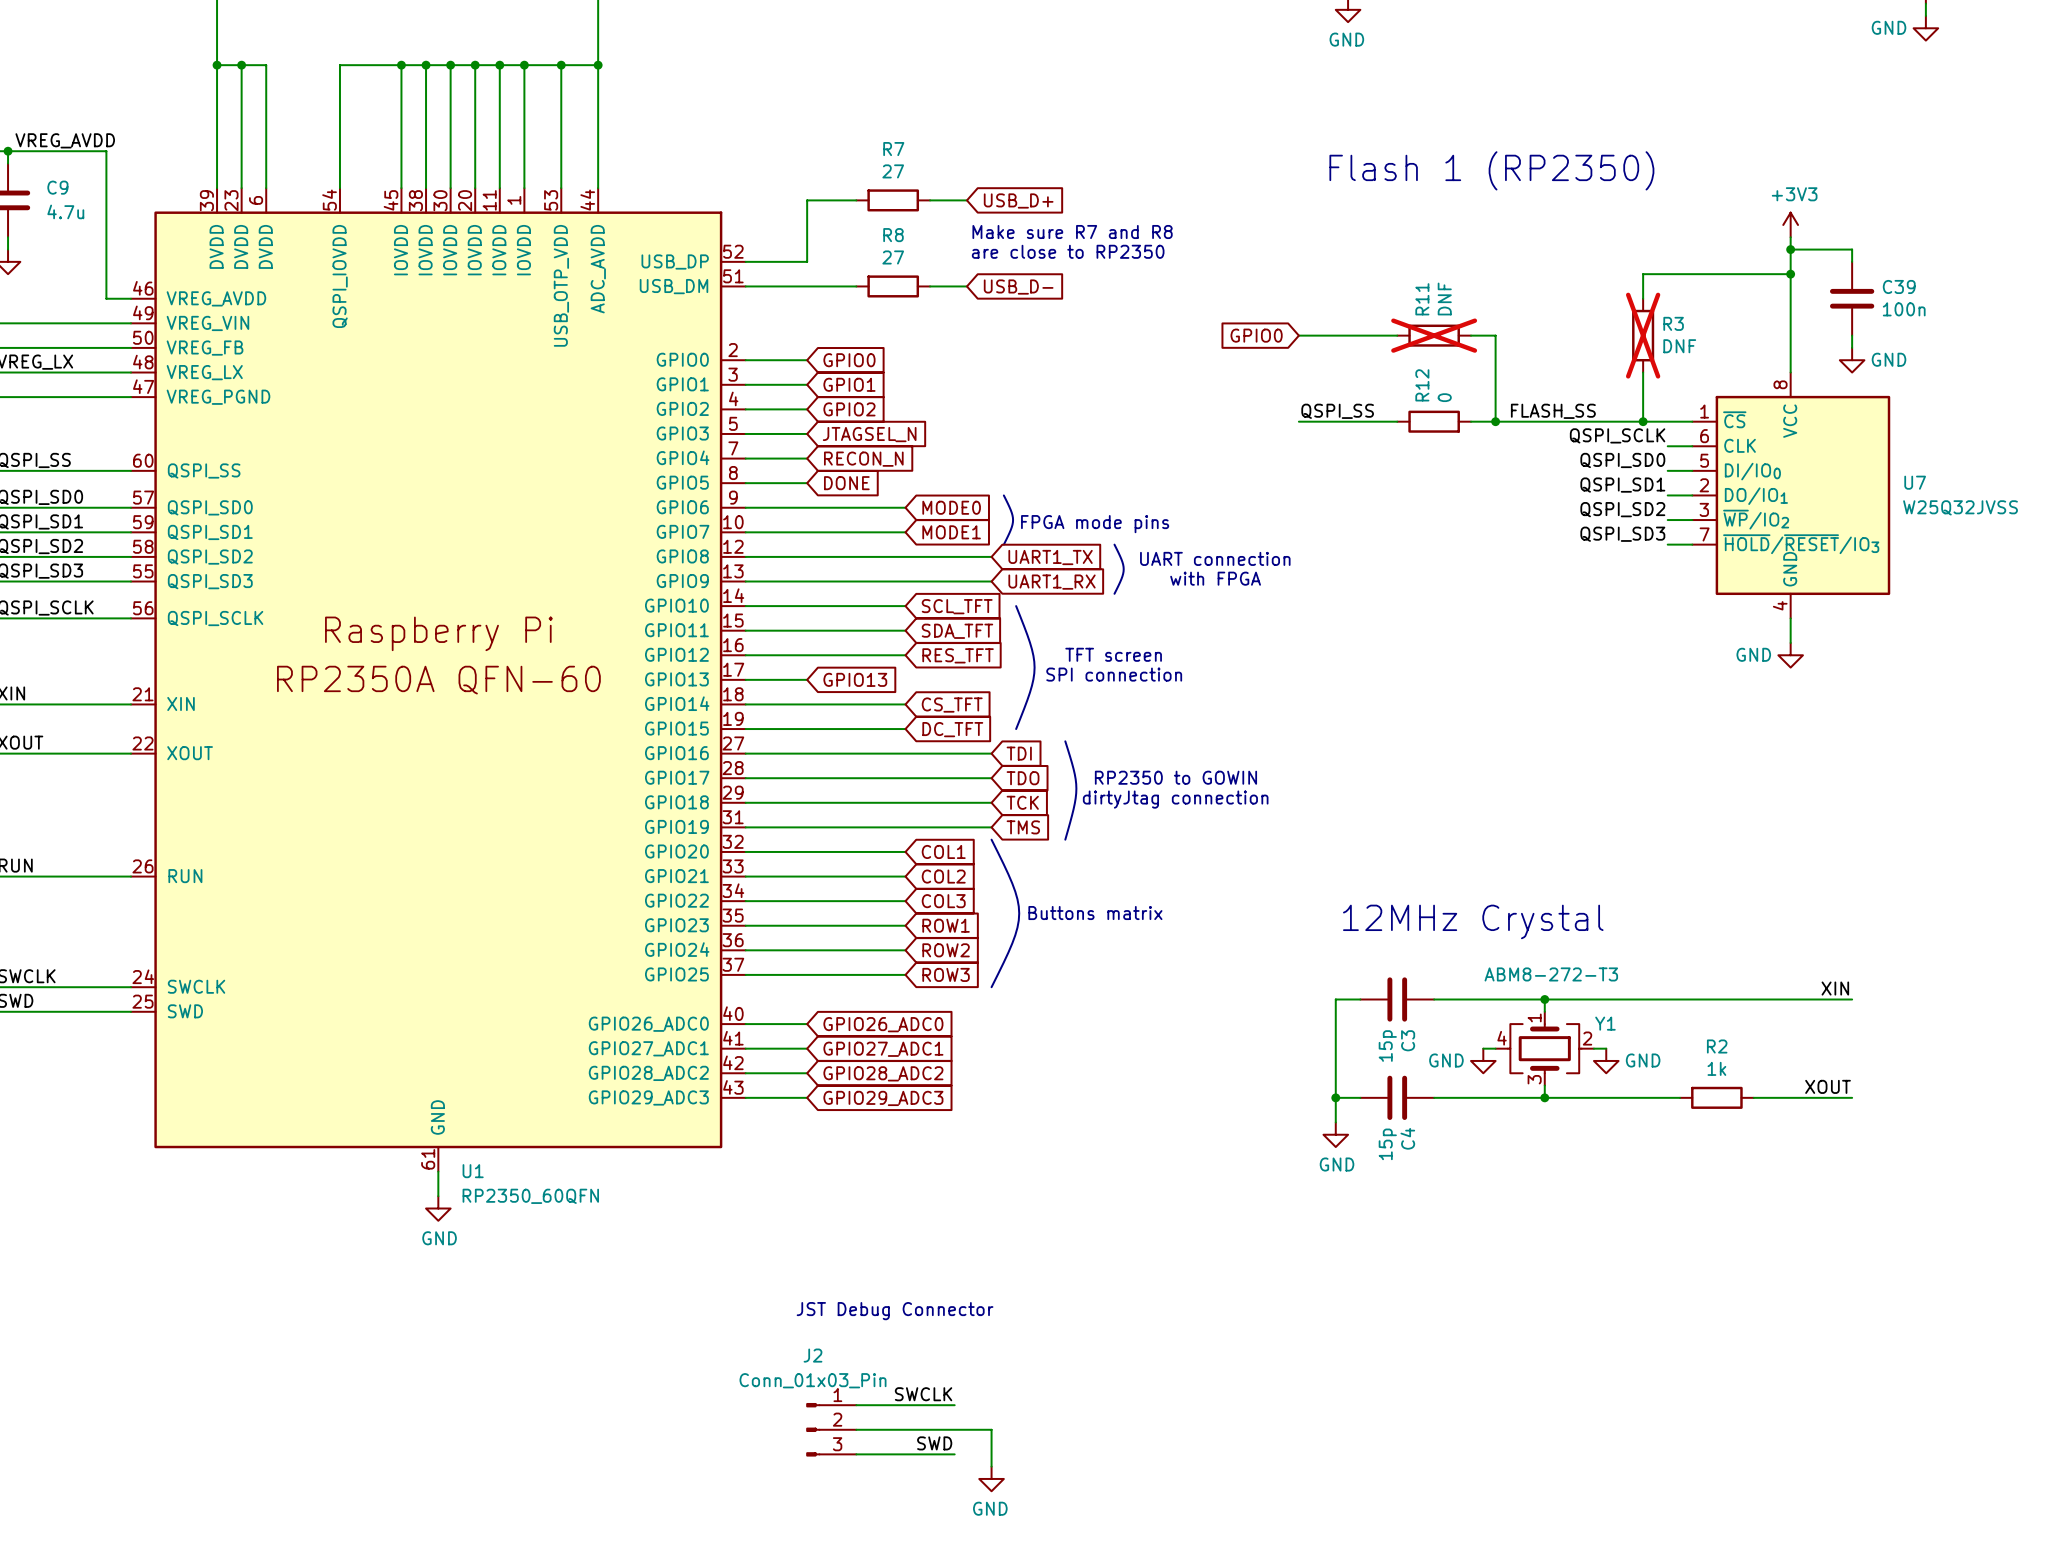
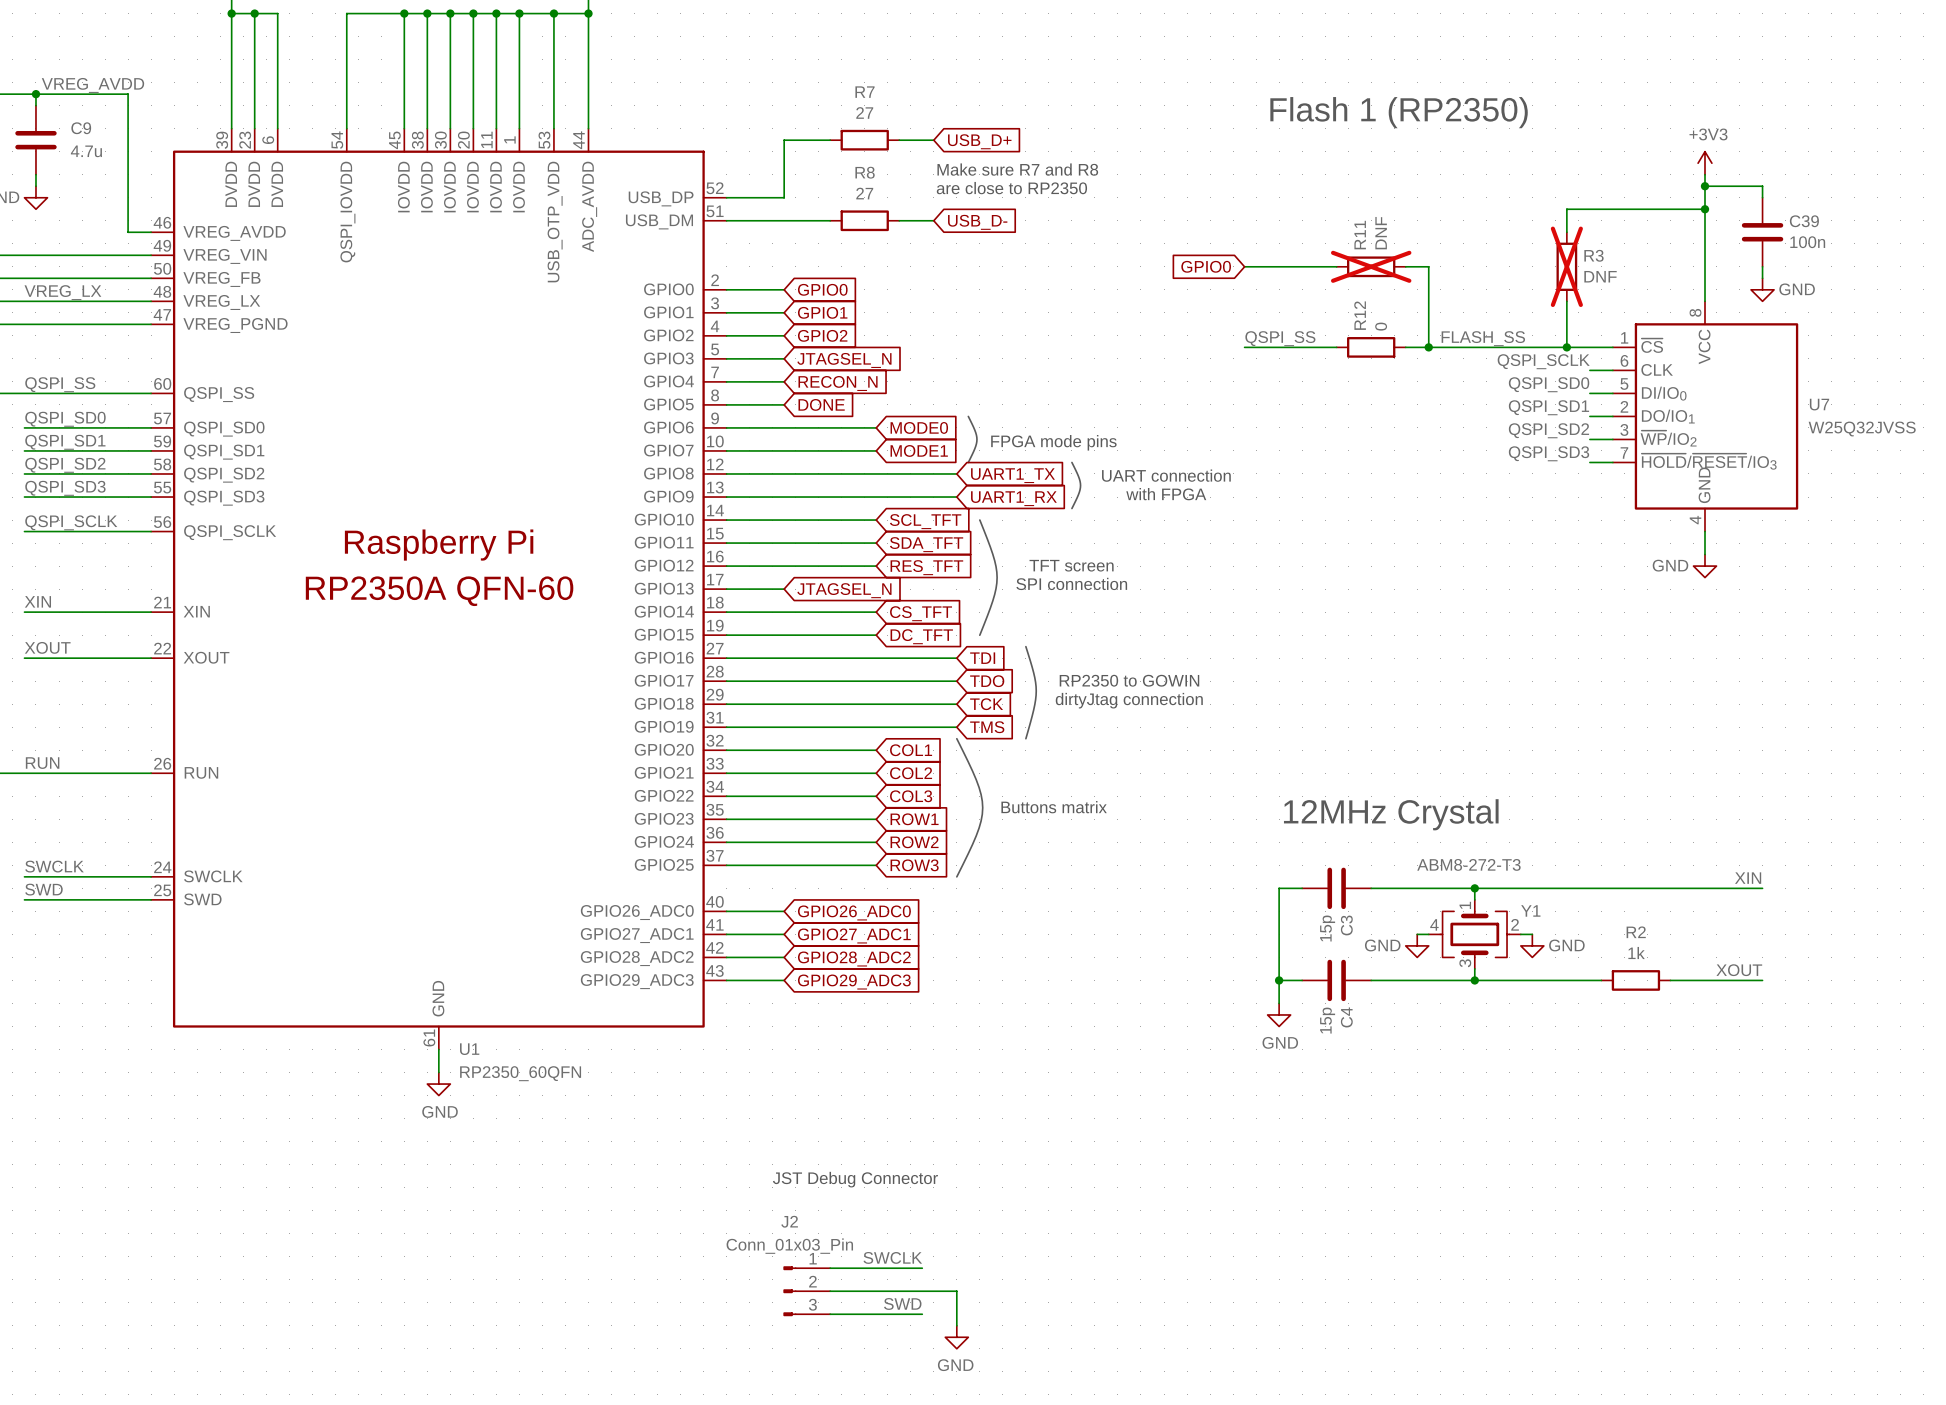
global label: GPIO13 (855, 679) -> JTAGSEL_N (844, 590)

